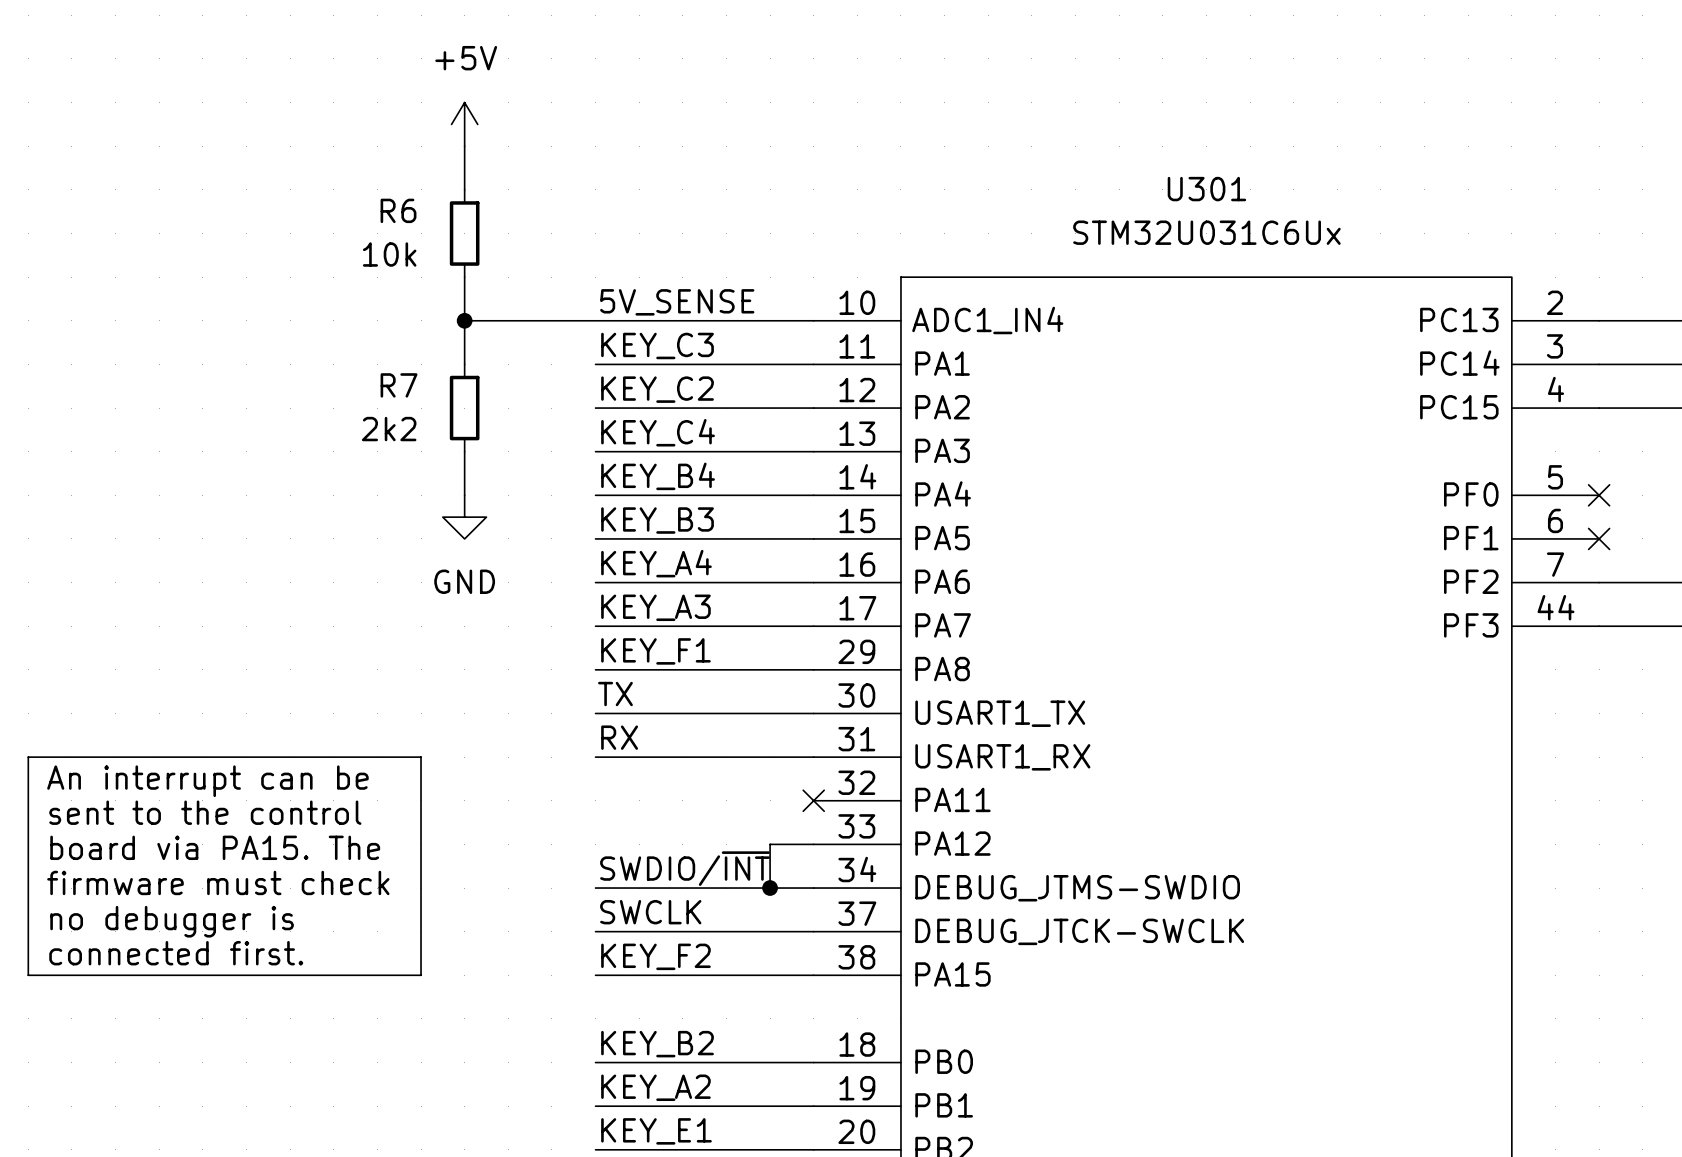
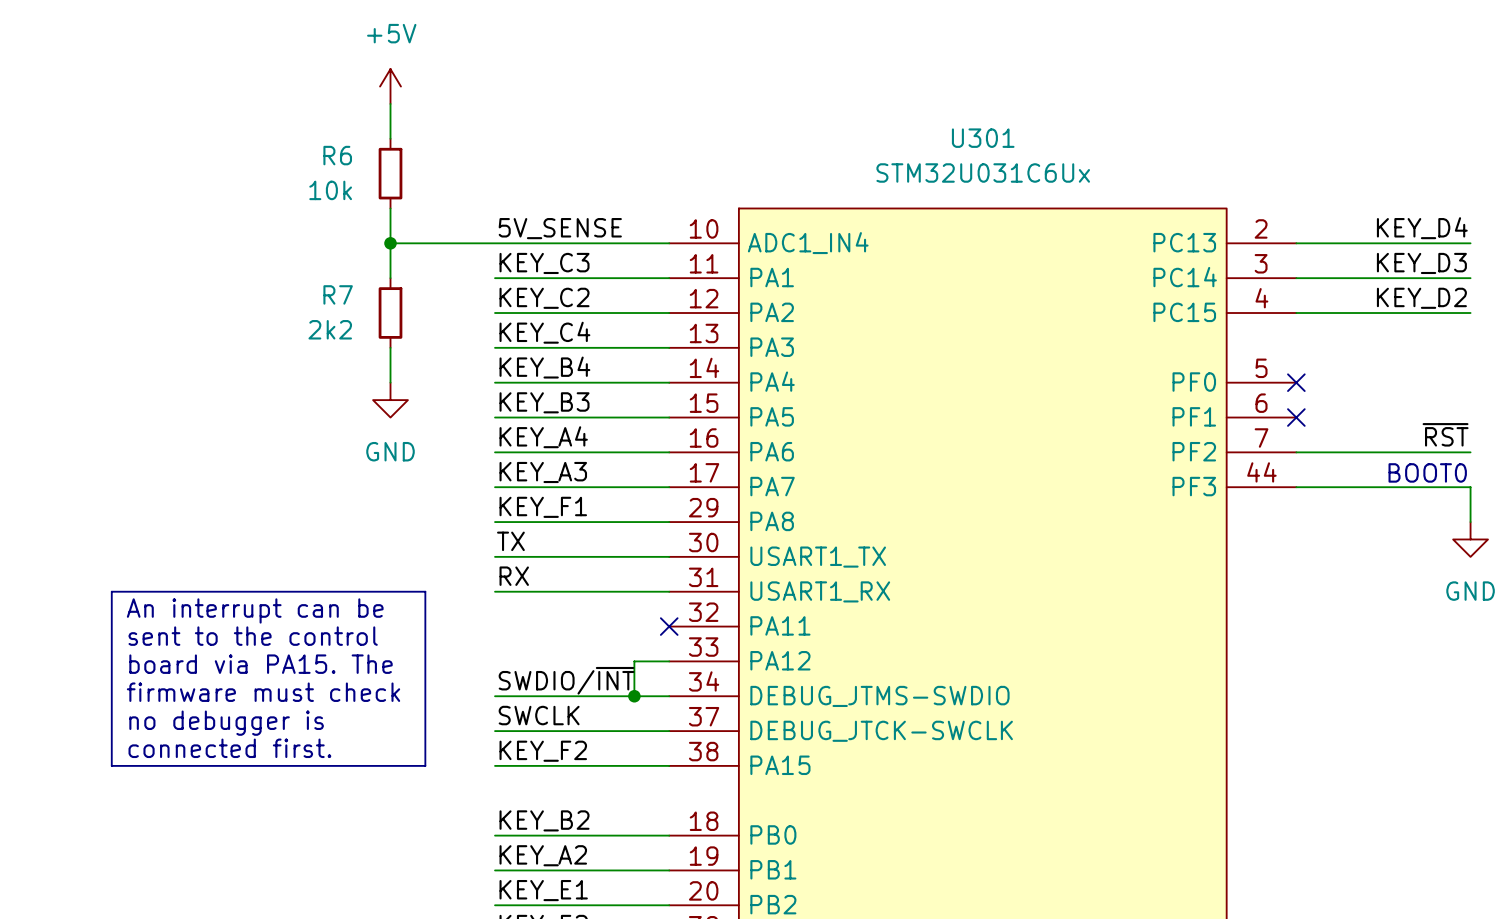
line: (115, 757) (28, 757) (28, 975) (115, 975) -> (111, 591) (111, 765)
line: (421, 757) (421, 975) -> (355, 591) (425, 591) (425, 765) (355, 765)
text position: An interrupt can be (207, 781) -> An interrupt can be (255, 610)
text position: sent to the control (205, 812) -> sent to the control (253, 636)
text position: board via PA15. The (215, 847) -> board via PA15. The (261, 664)
text position: firmware must check (218, 882) -> firmware must check (263, 692)
text position: no debugger is (172, 921) -> no debugger is (226, 723)
text position: connected first. (176, 953) -> connected first. (229, 748)

